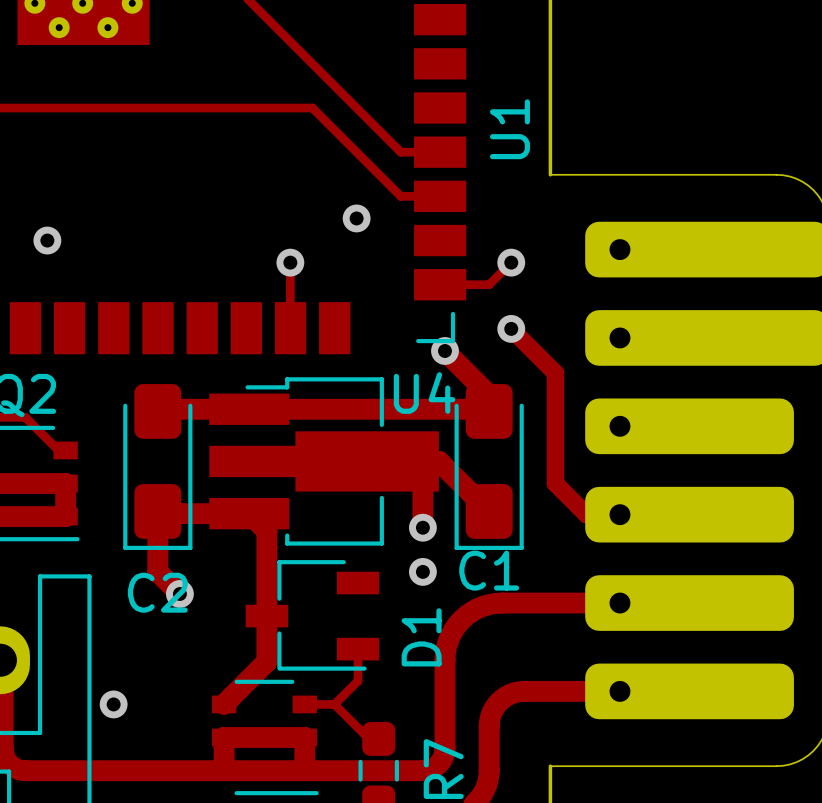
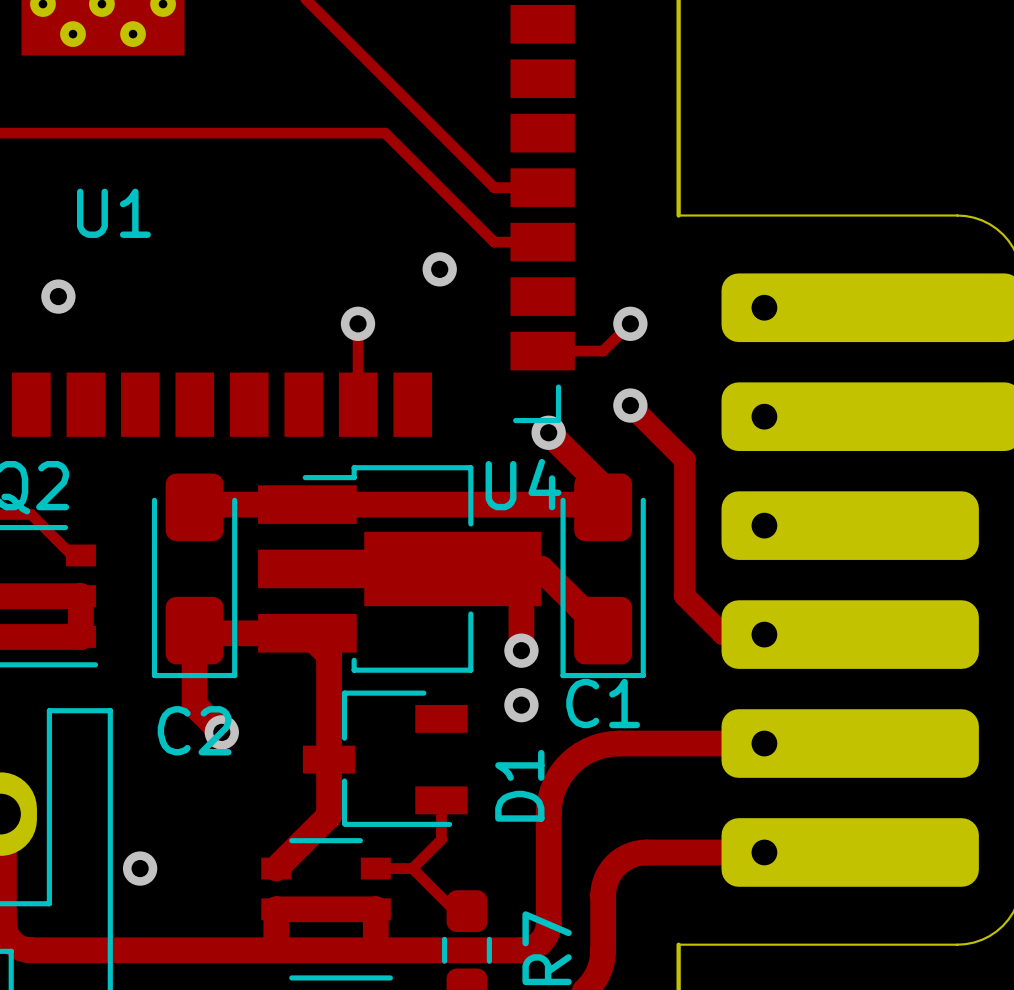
U1 name rotation: 0° (509, 129) -> 90° clockwise (113, 213)
U1 name position: U1 (509, 129) -> U1 (113, 213)

